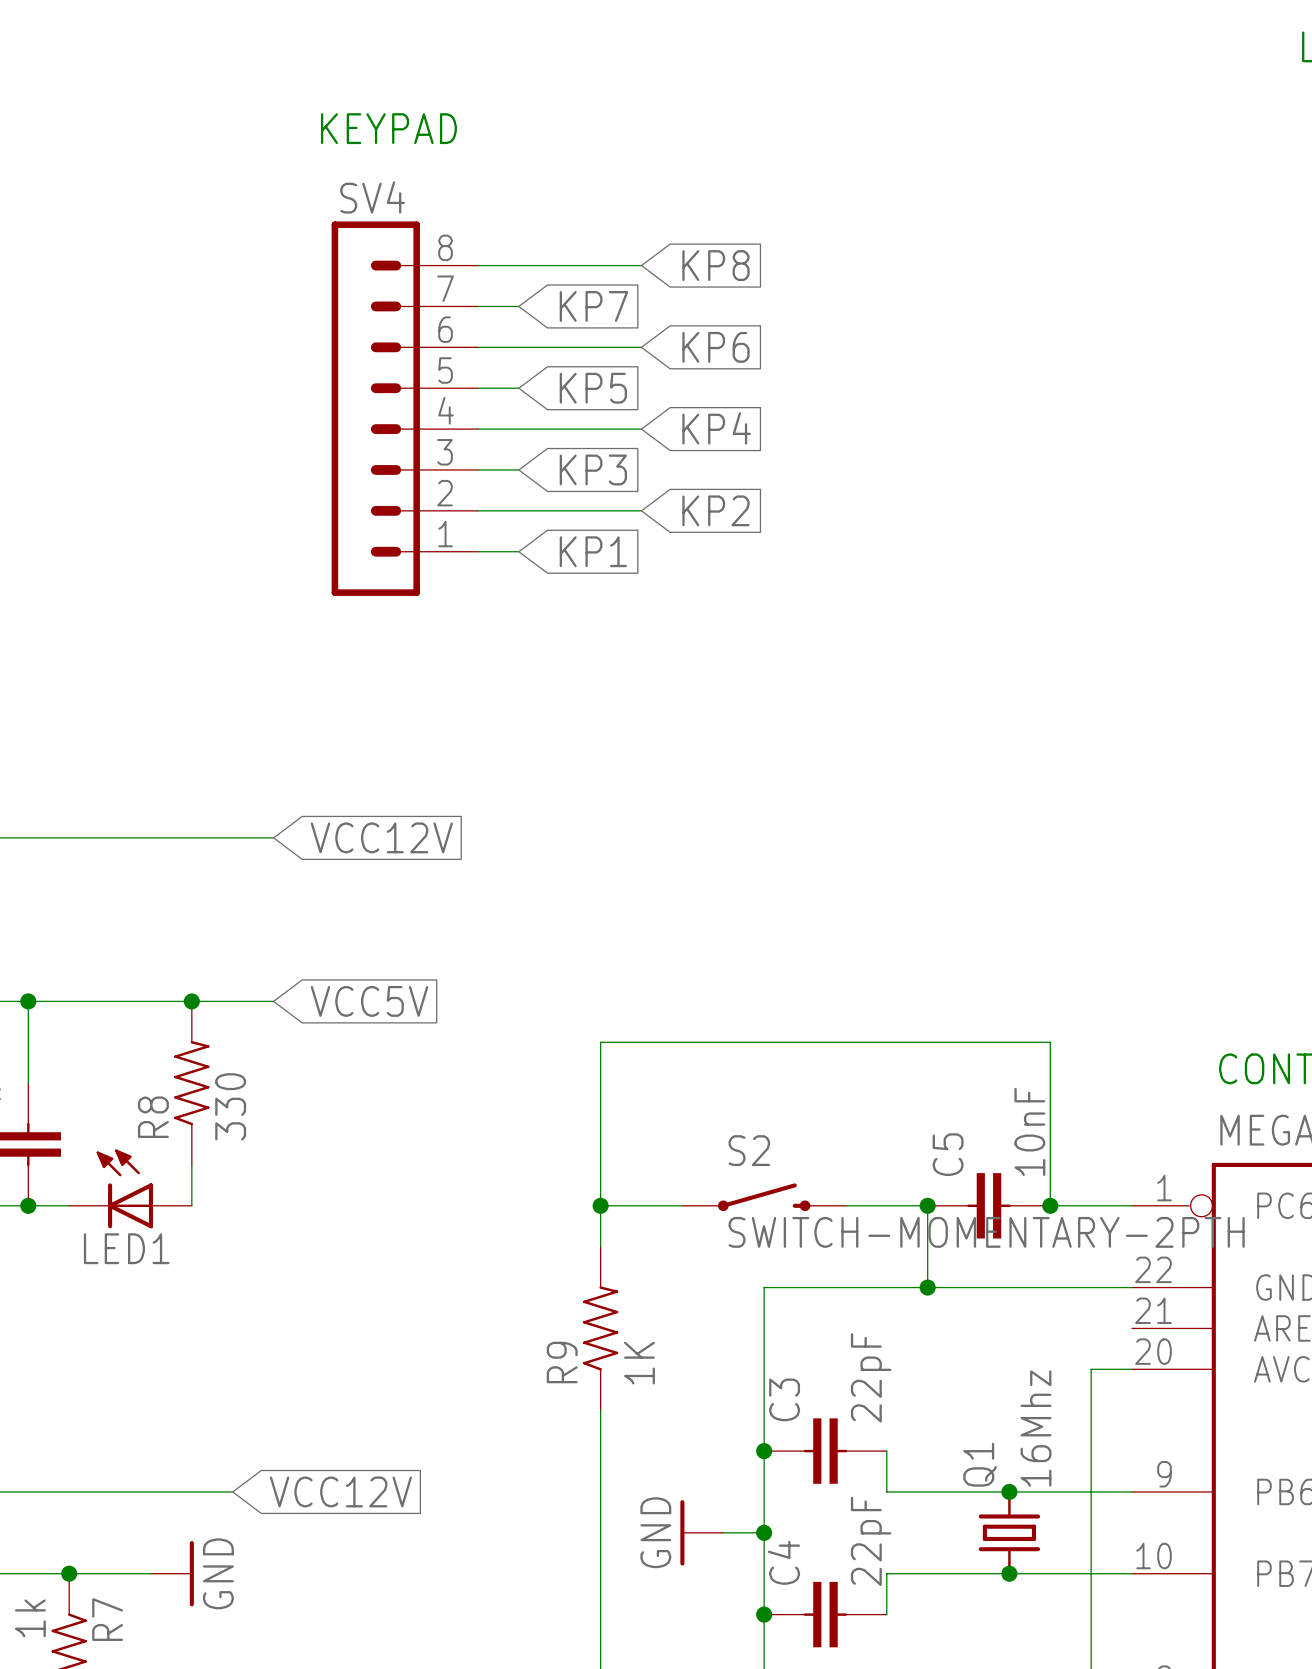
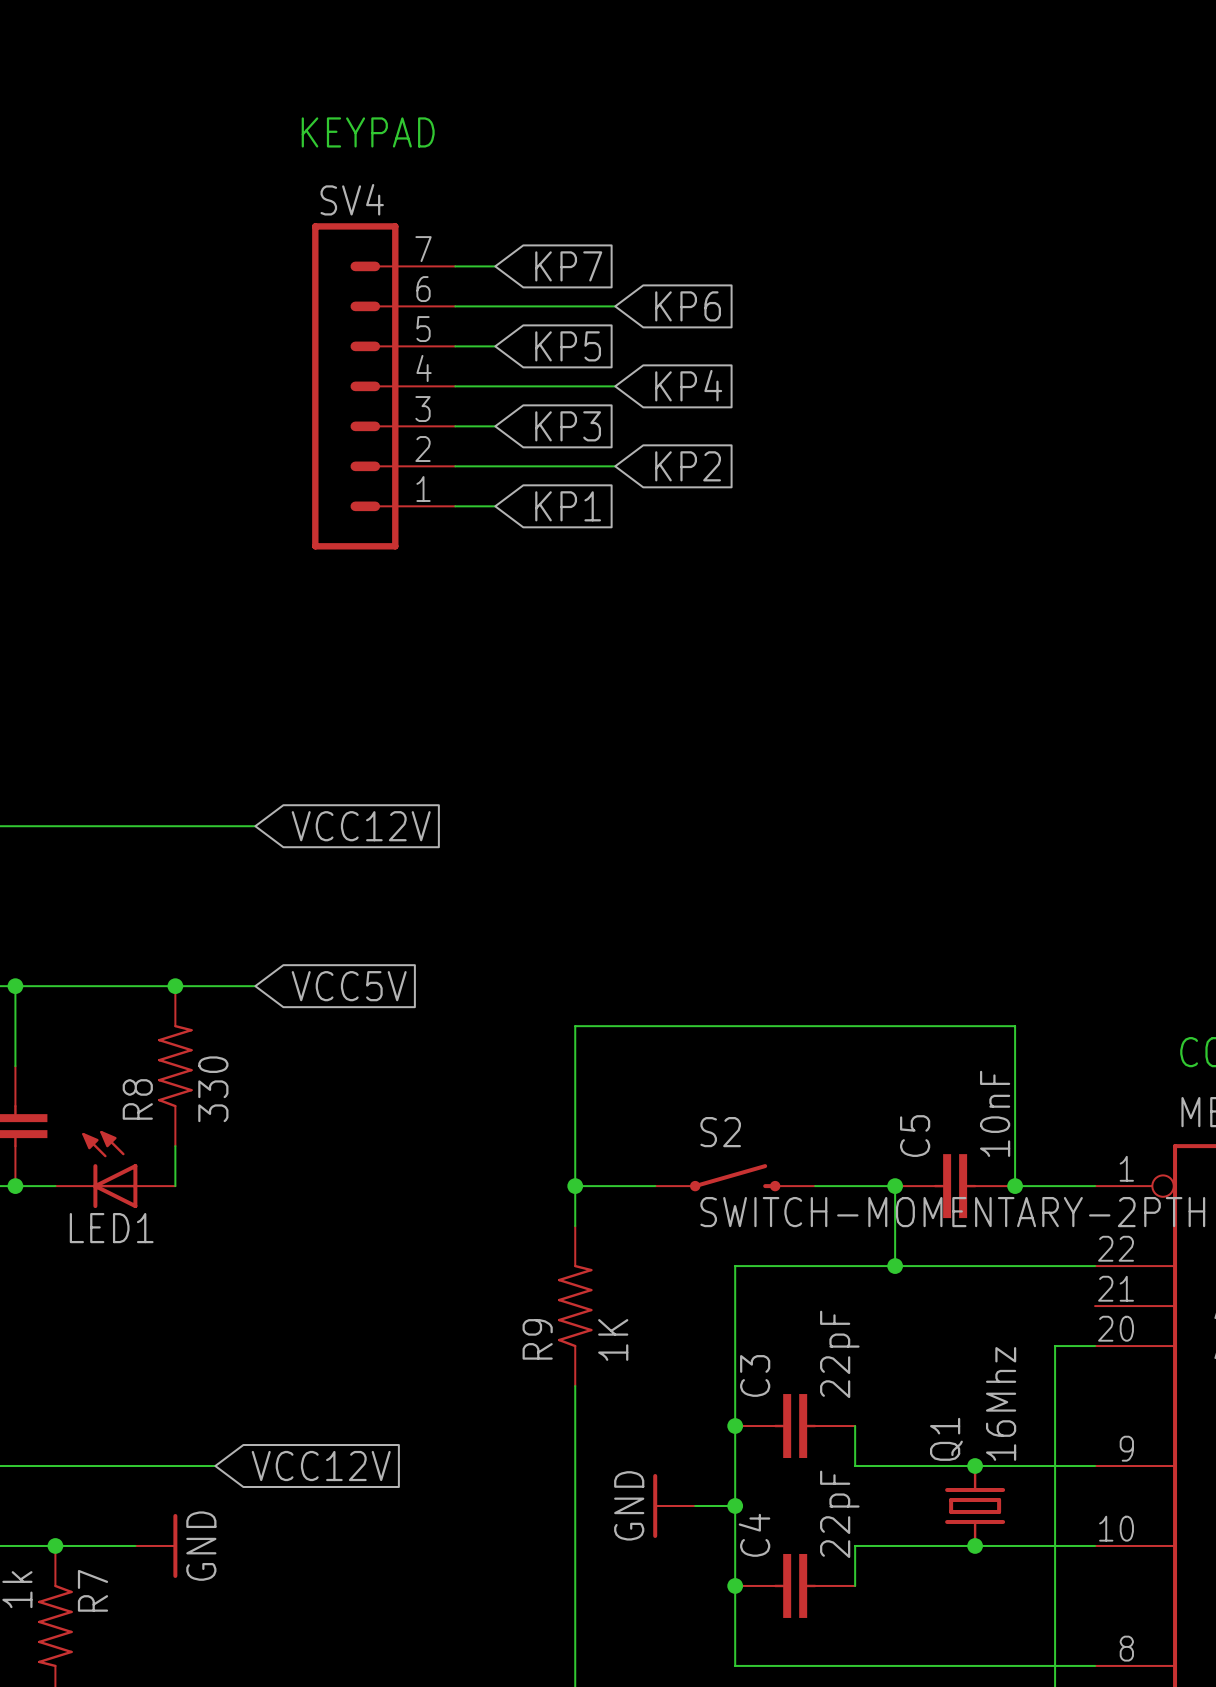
SV4 symbol: [331, 221, 478, 596] -> [312, 223, 456, 550]
wire: (518, 265) (641, 265) -> none
global label: KP8 (715, 265) -> none
global label position: KP7 (593, 306) -> KP7 (568, 266)
wire: (518, 347) (641, 347) -> (495, 306) (615, 306)
global label position: KP6 (715, 347) -> KP6 (688, 306)
global label position: KP5 (593, 388) -> KP5 (568, 346)
global label position: KP4 (716, 428) -> KP4 (688, 385)
wire: (518, 429) (641, 429) -> (495, 386) (615, 386)
global label position: KP3 (593, 469) -> KP3 (568, 426)
wire: (518, 510) (641, 510) -> (495, 466) (615, 466)
global label position: KP2 (715, 510) -> KP2 (688, 466)
wire: (477, 551) (518, 551) -> none
global label position: KP1 (593, 551) -> KP1 (568, 506)

